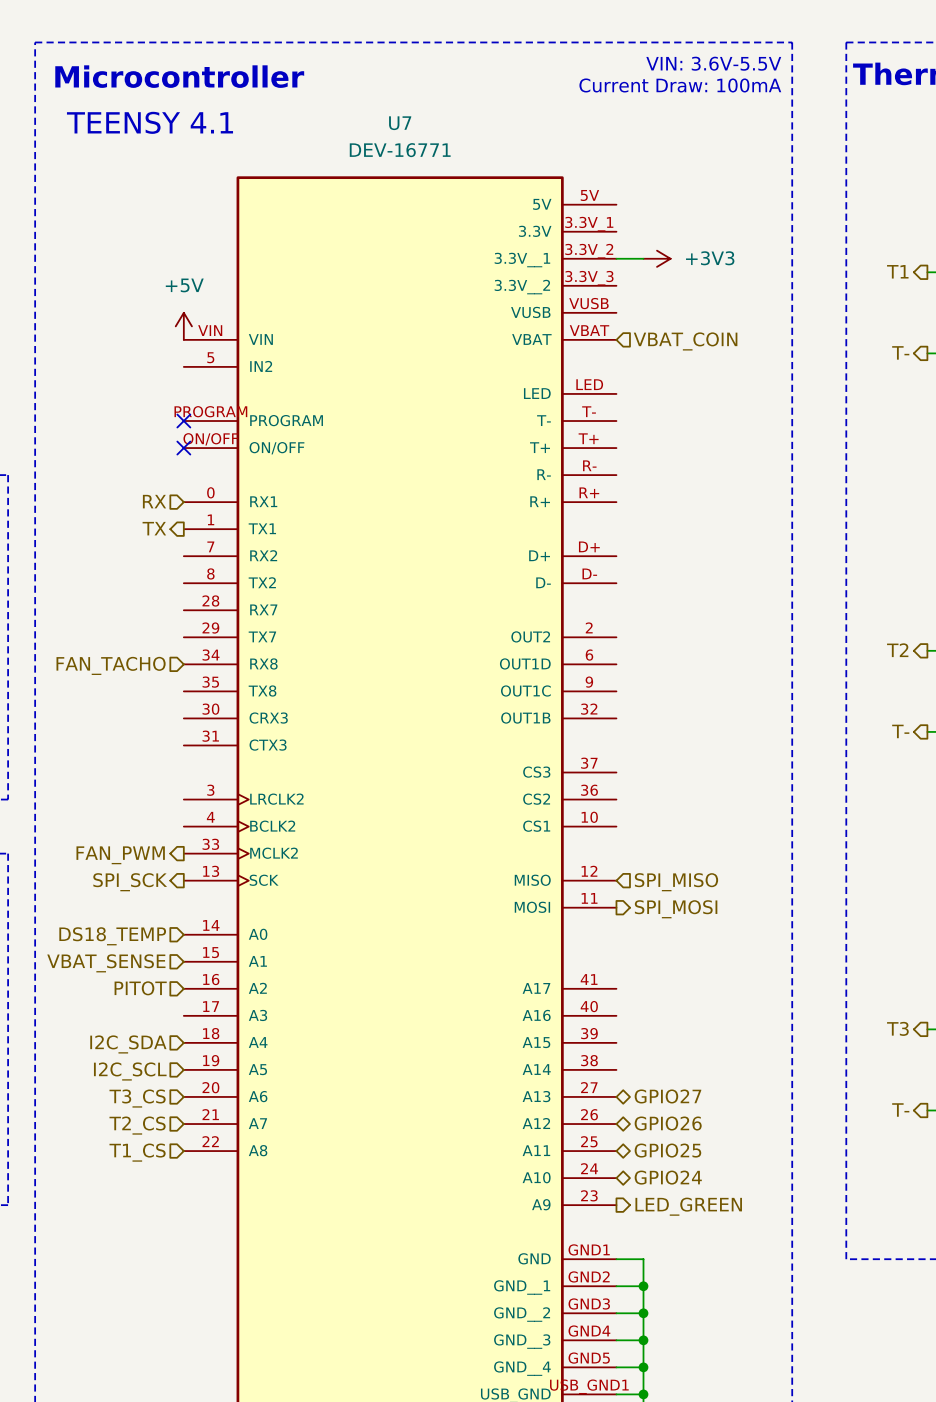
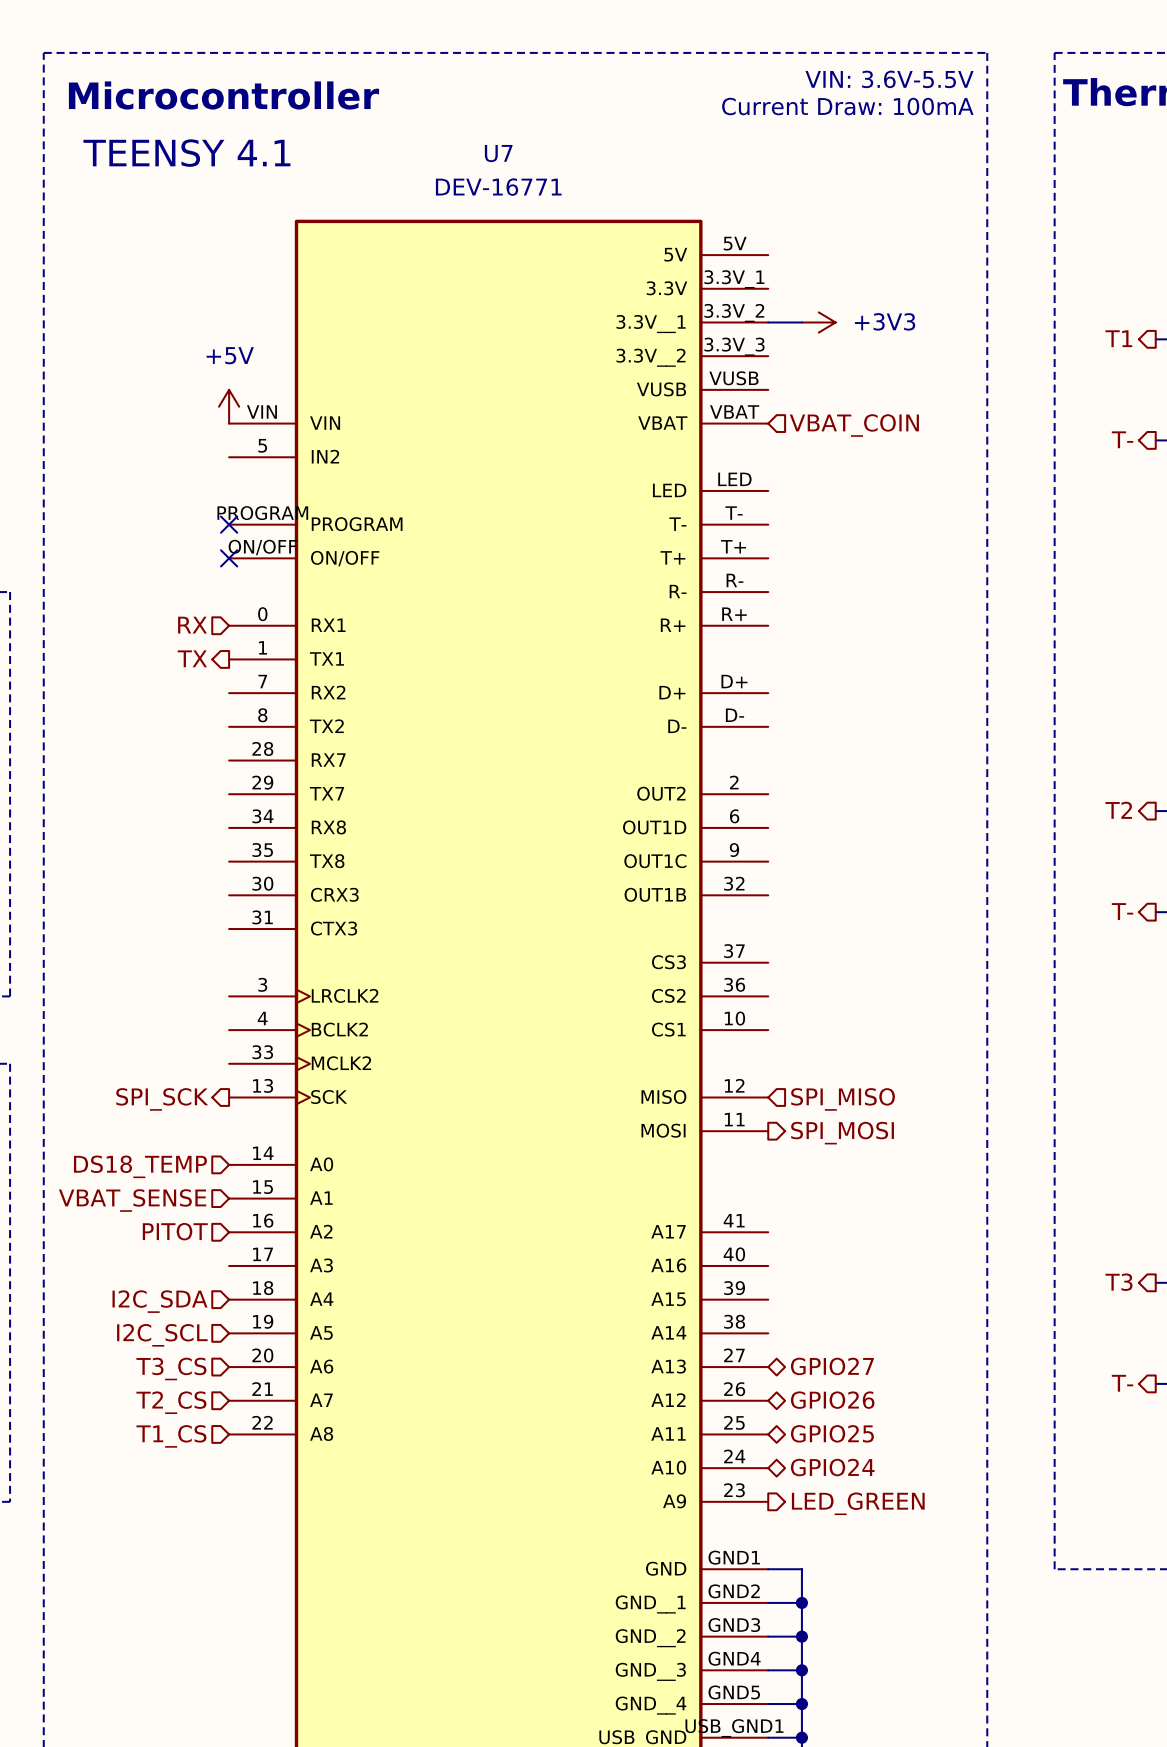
hierarchical label: FAN_TACHO (111, 665) -> none
hierarchical label: FAN_PWM (120, 855) -> none

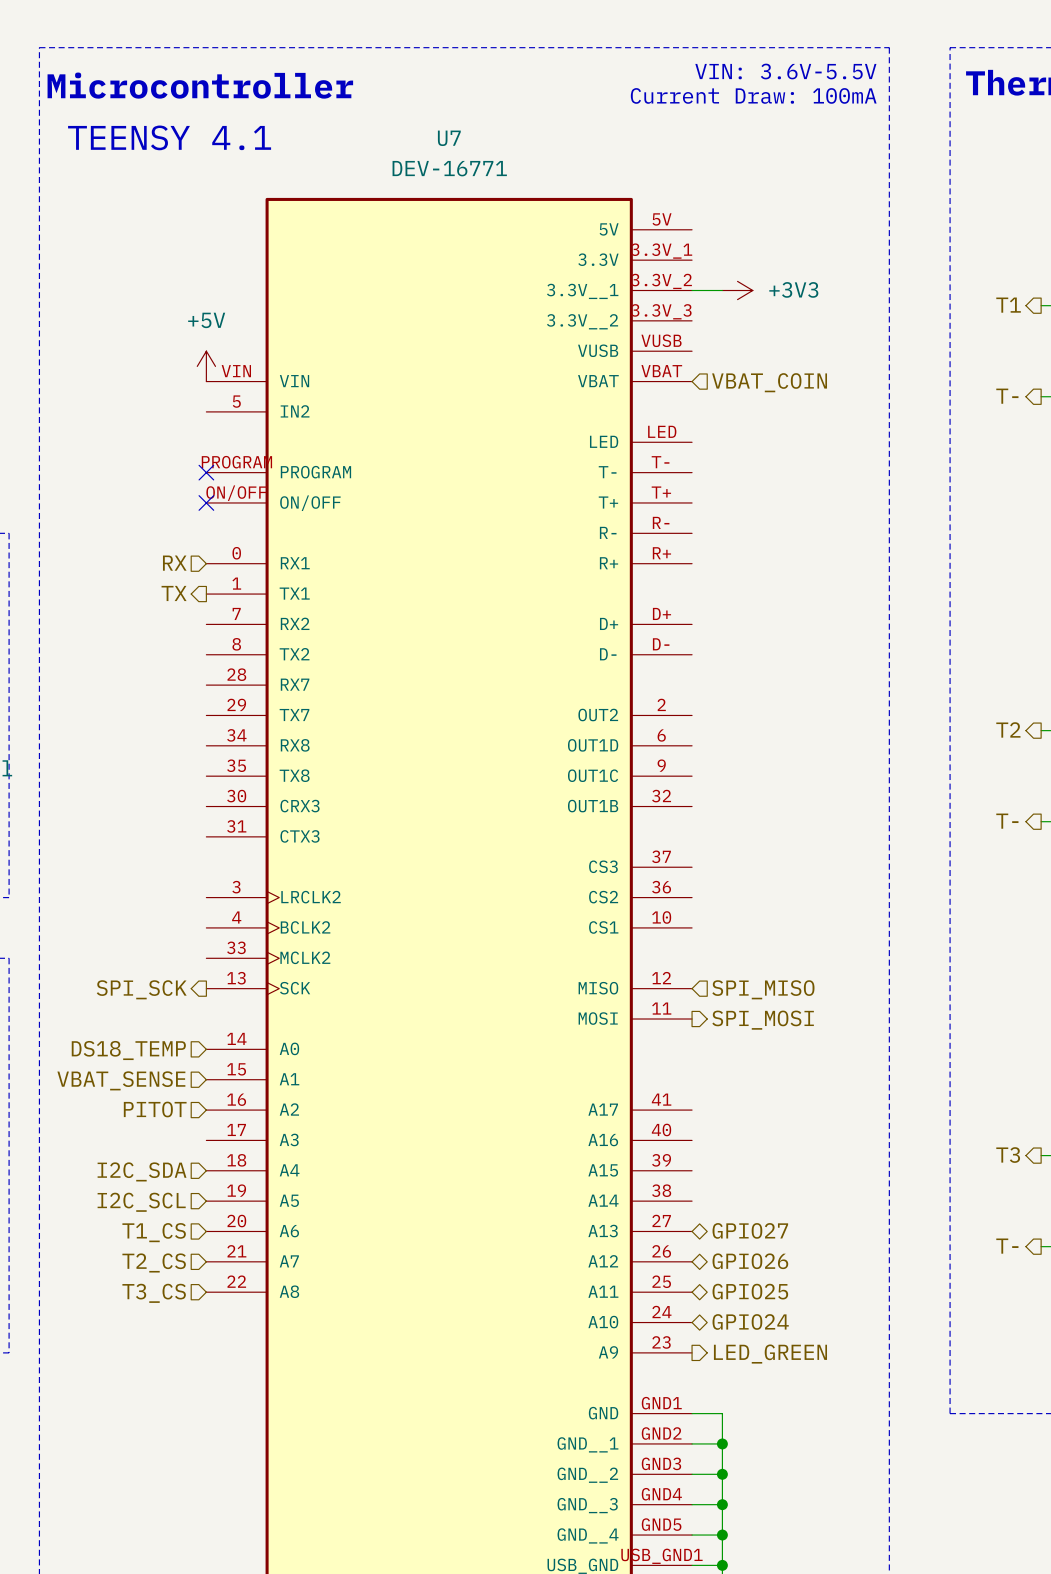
hierarchical label: T3_CS (171, 1369) -> T1_CS (154, 1232)
hierarchical label: T1_CS (171, 1436) -> T3_CS (154, 1293)

